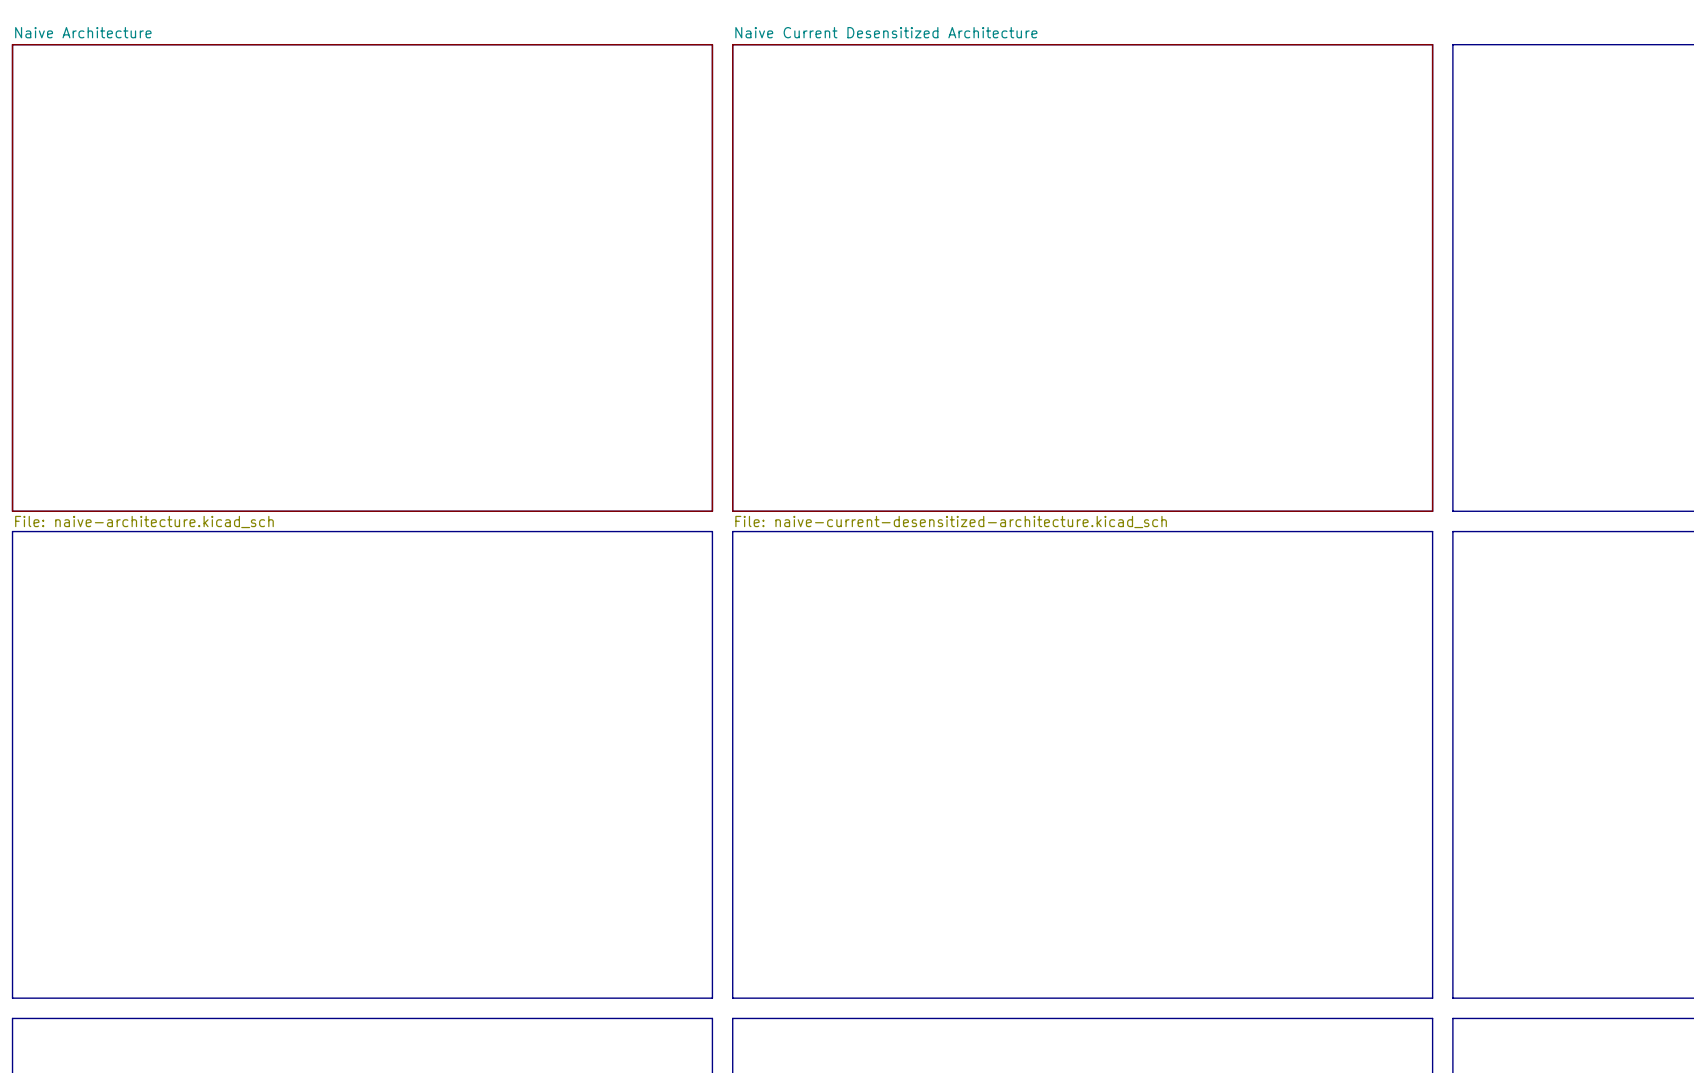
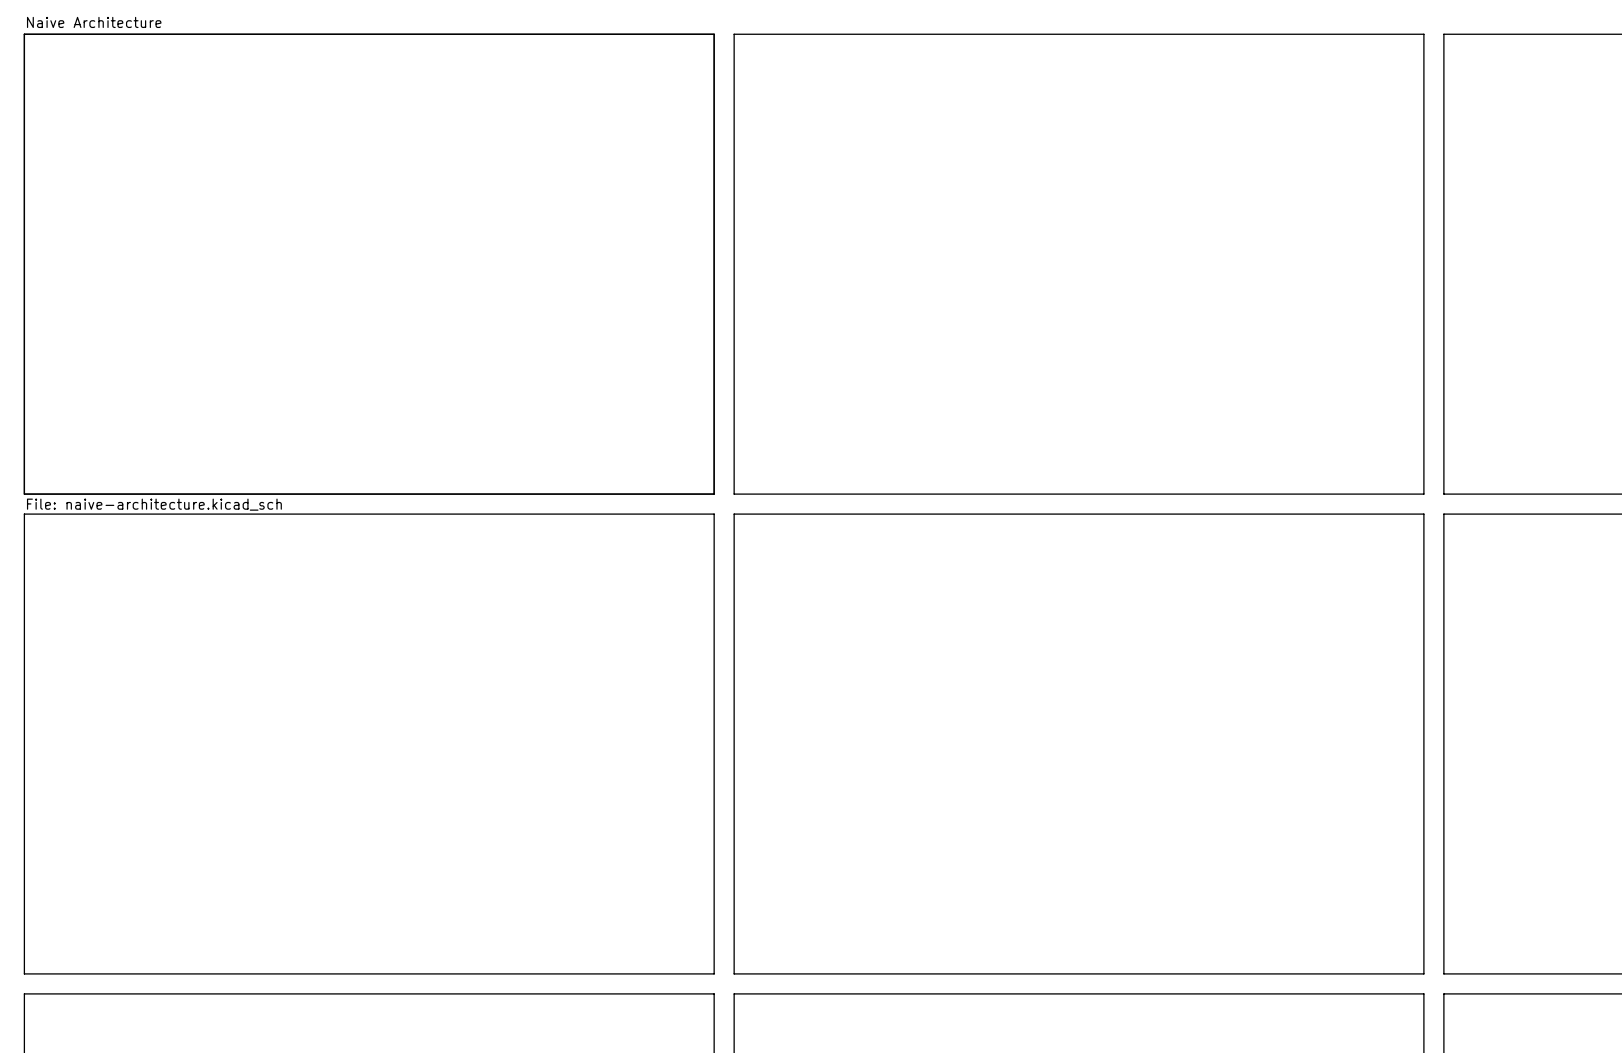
sheet Naive Current Desensitized Architecture: File: naive-current-desensitized-architecture.kicad_sch (1082, 277) -> none

